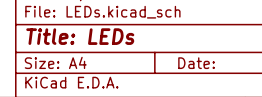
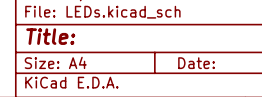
title block: Title: LEDs (80, 36) -> Title: (50, 36)

